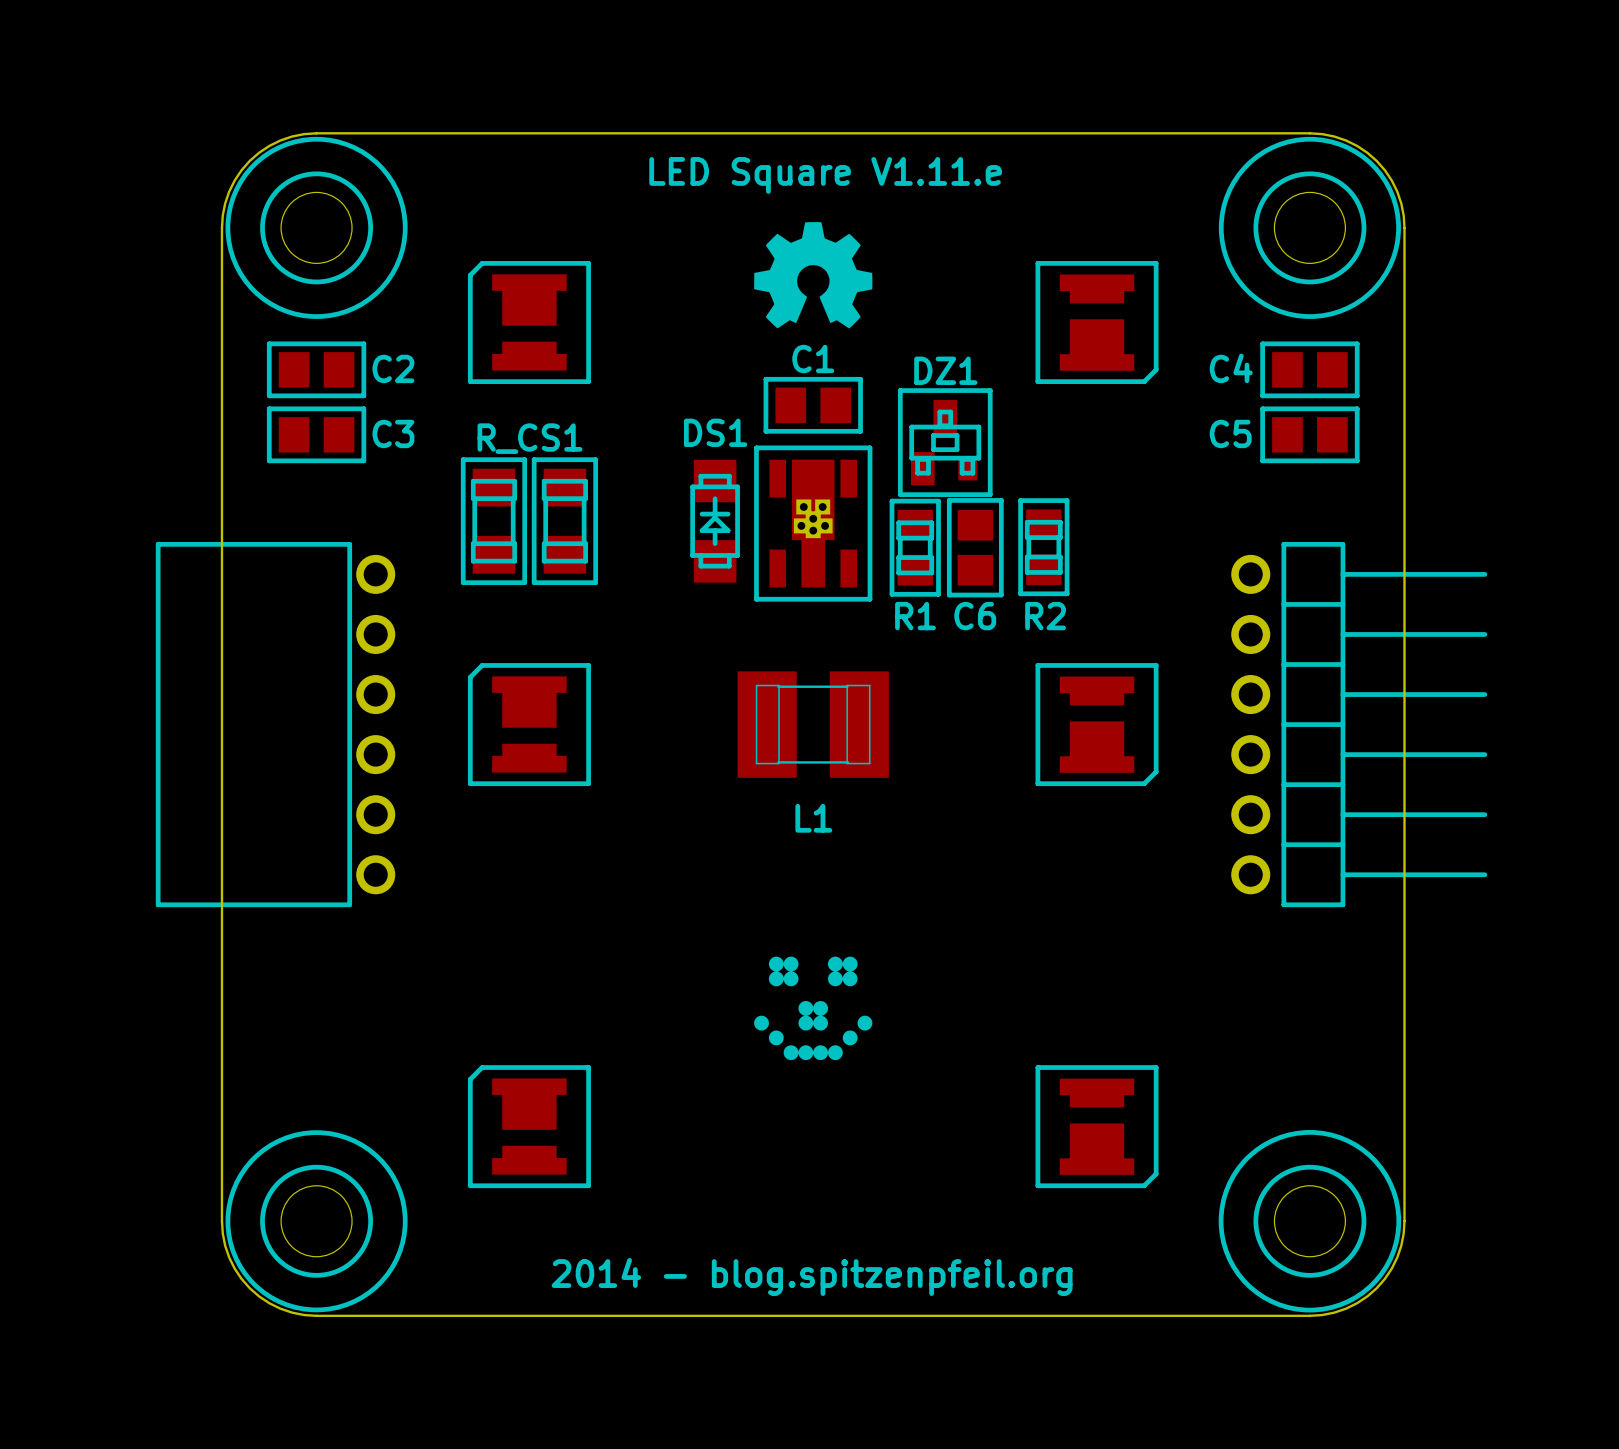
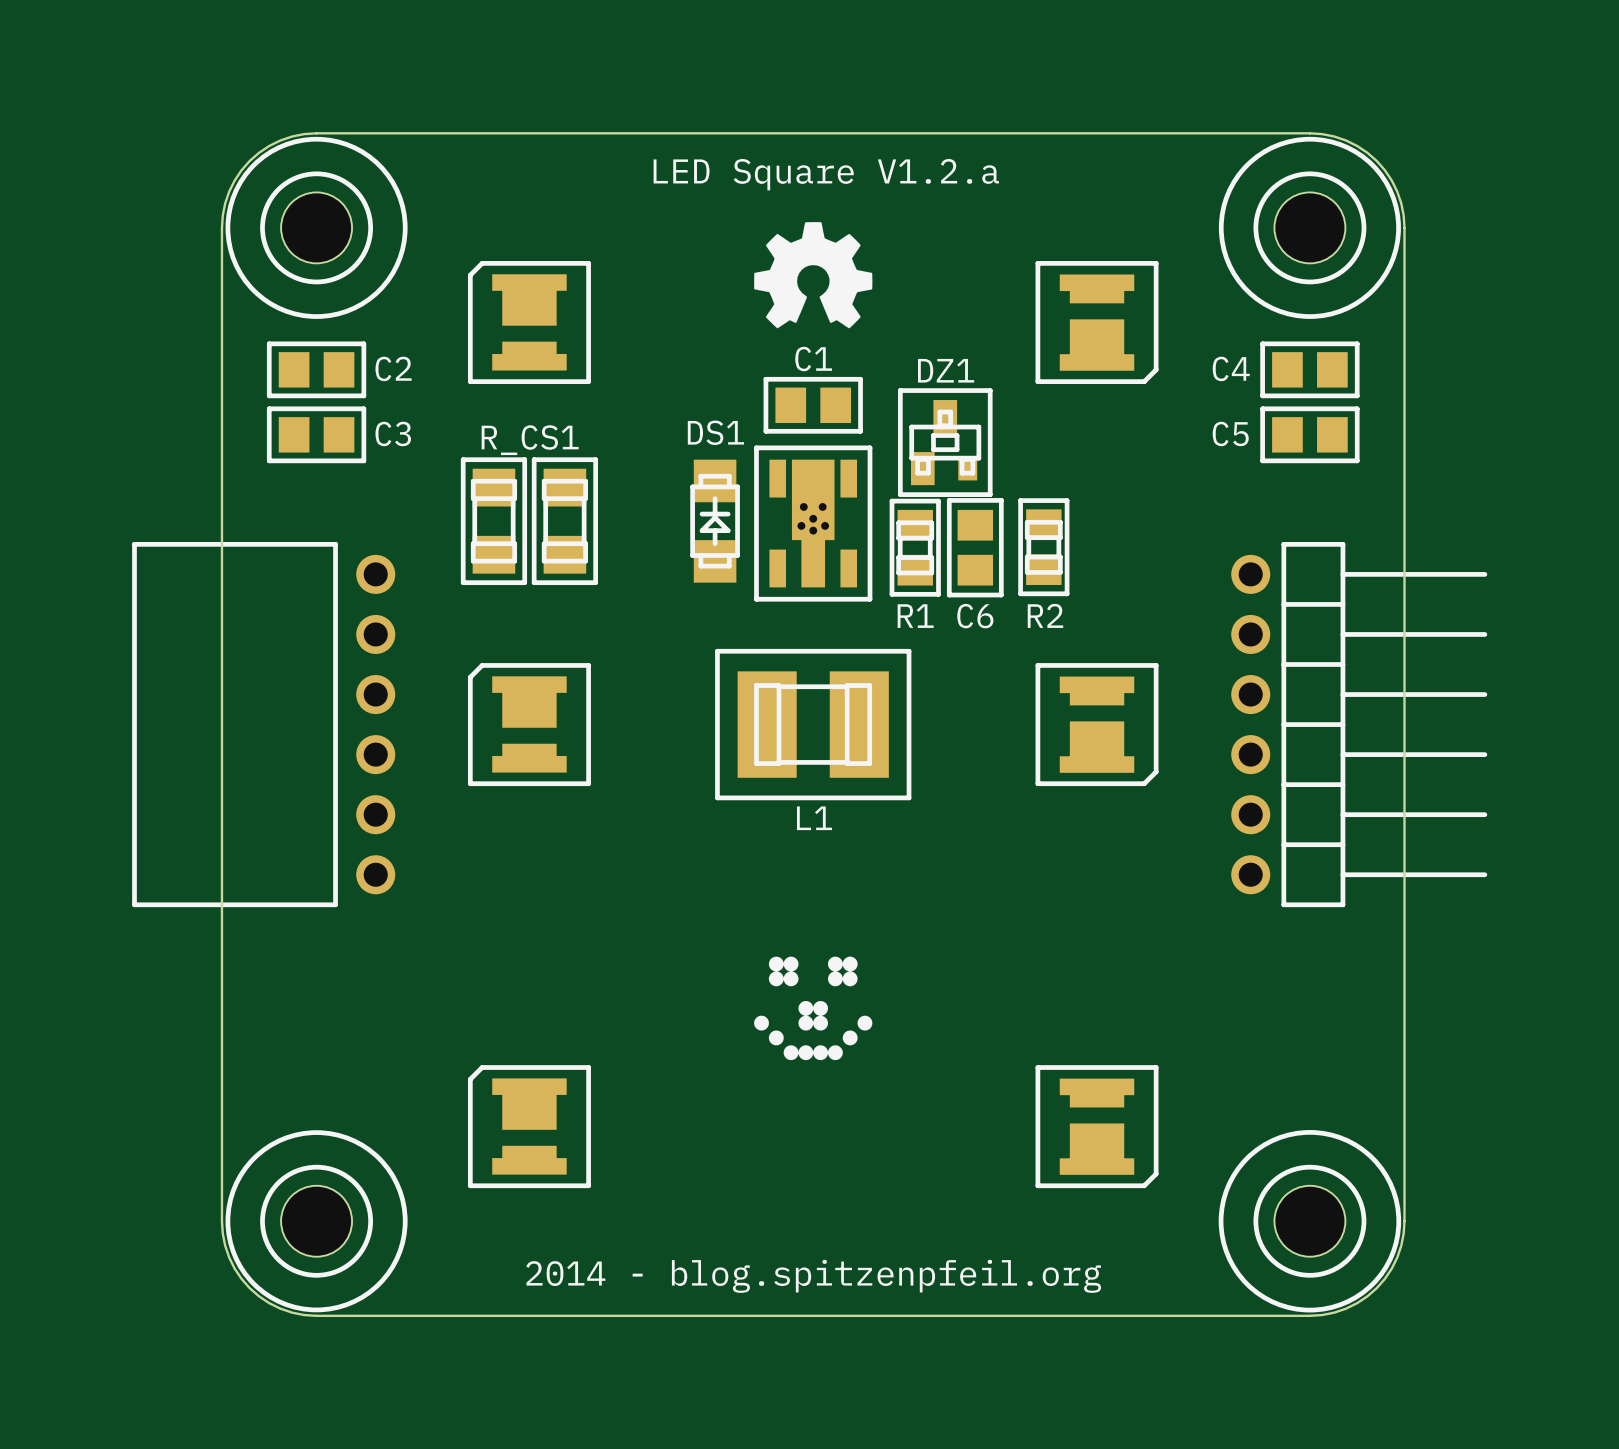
text: LED Square V1.11.e (825, 175) -> LED Square V1.2.a (826, 174)
part footprint: [155, 541, 396, 908] -> [132, 541, 396, 908]
L1 footprint: [737, 671, 889, 778] -> [715, 648, 912, 801]

